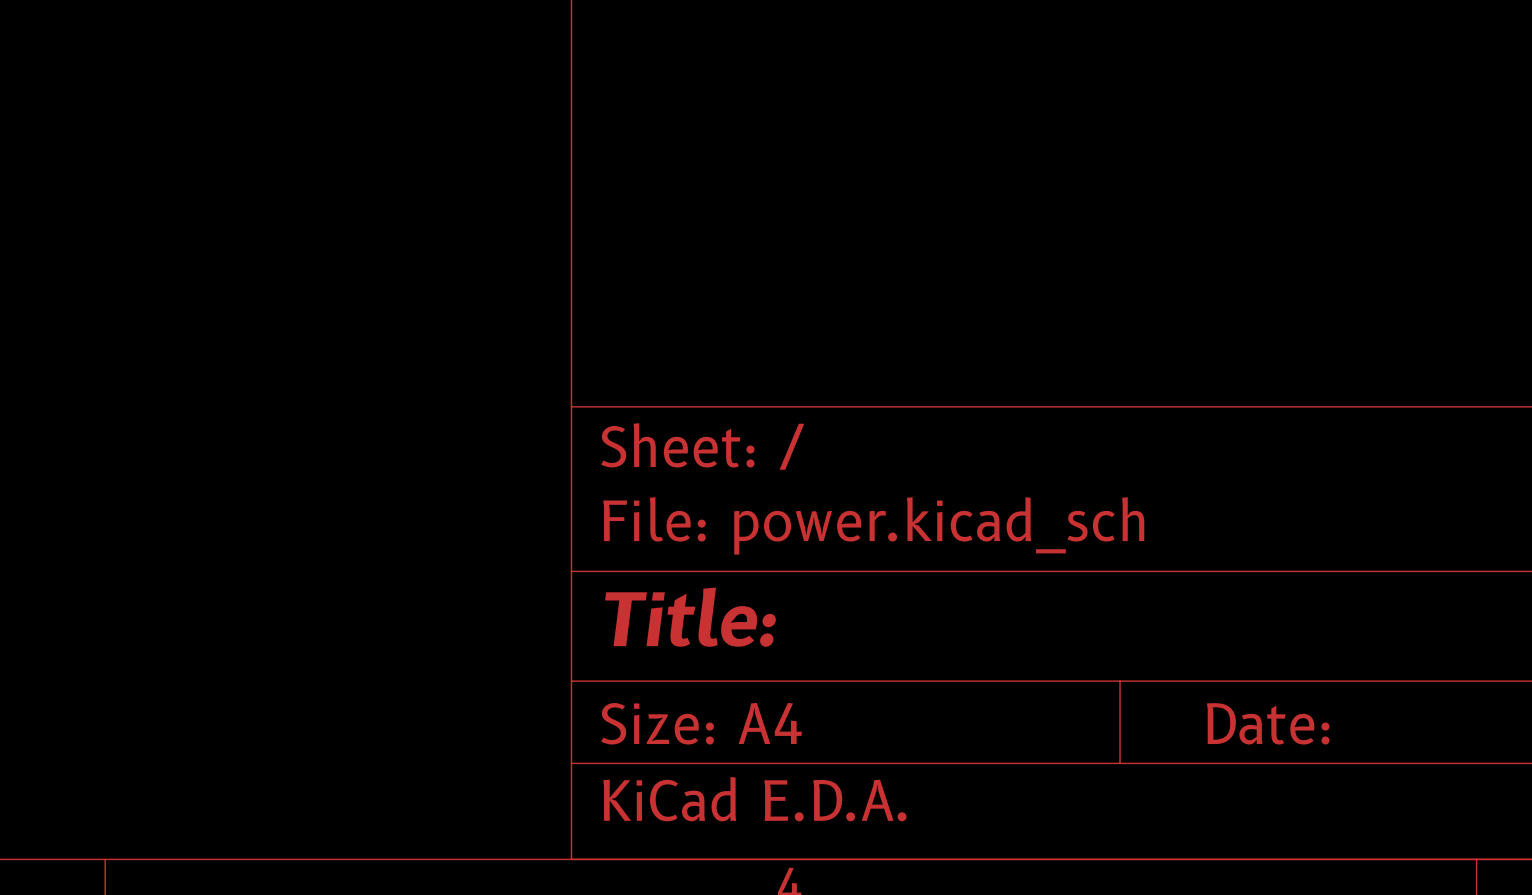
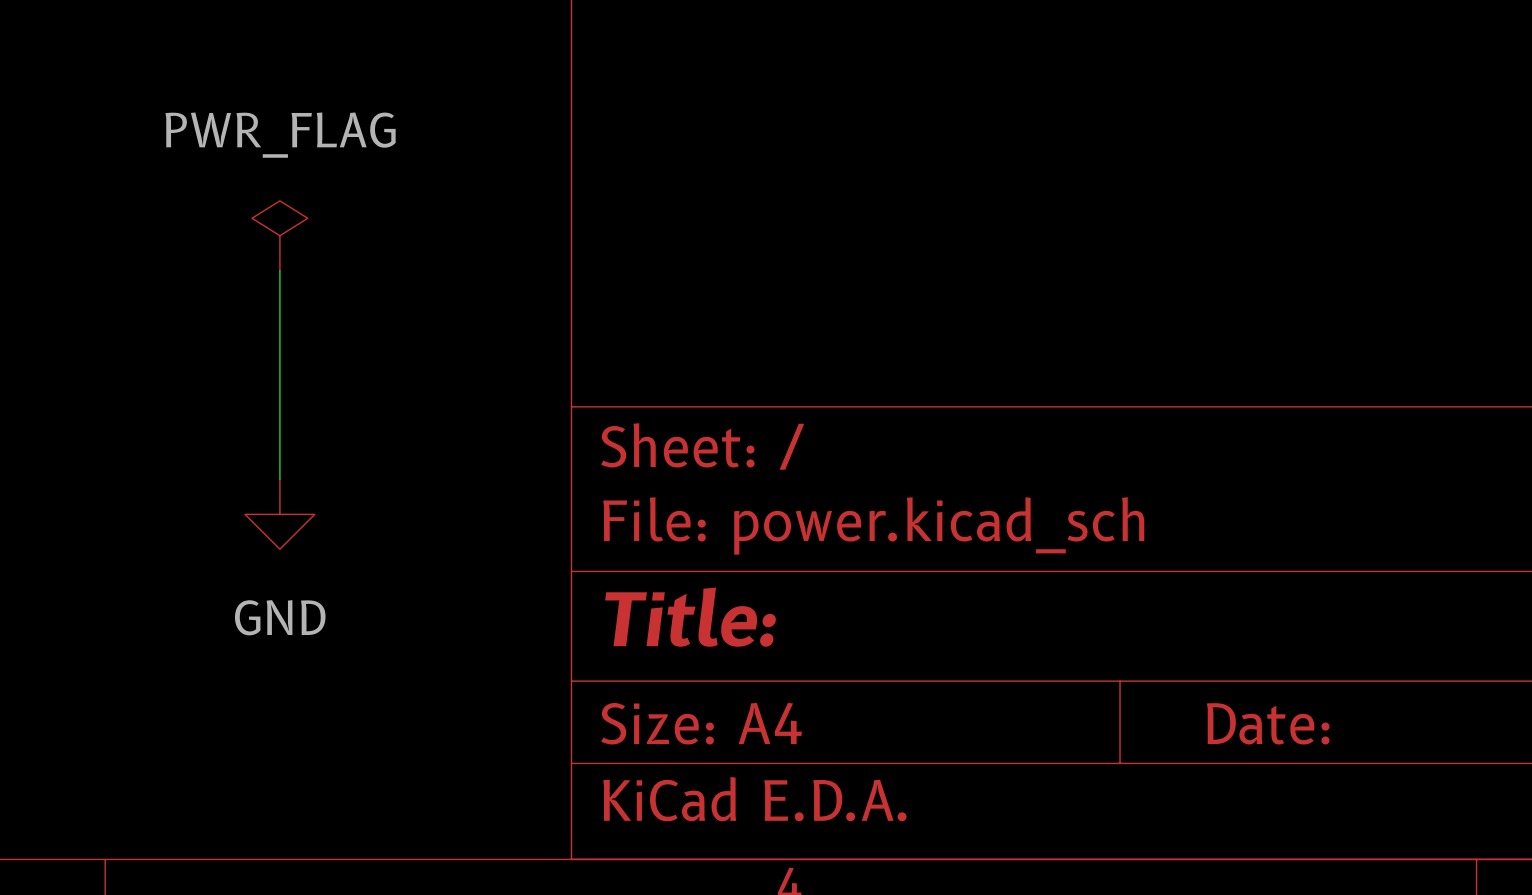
power symbol: none -> PWR_FLAG (279, 235)
wire: none -> (279, 270) (279, 479)
power symbol: none -> GND (279, 514)

